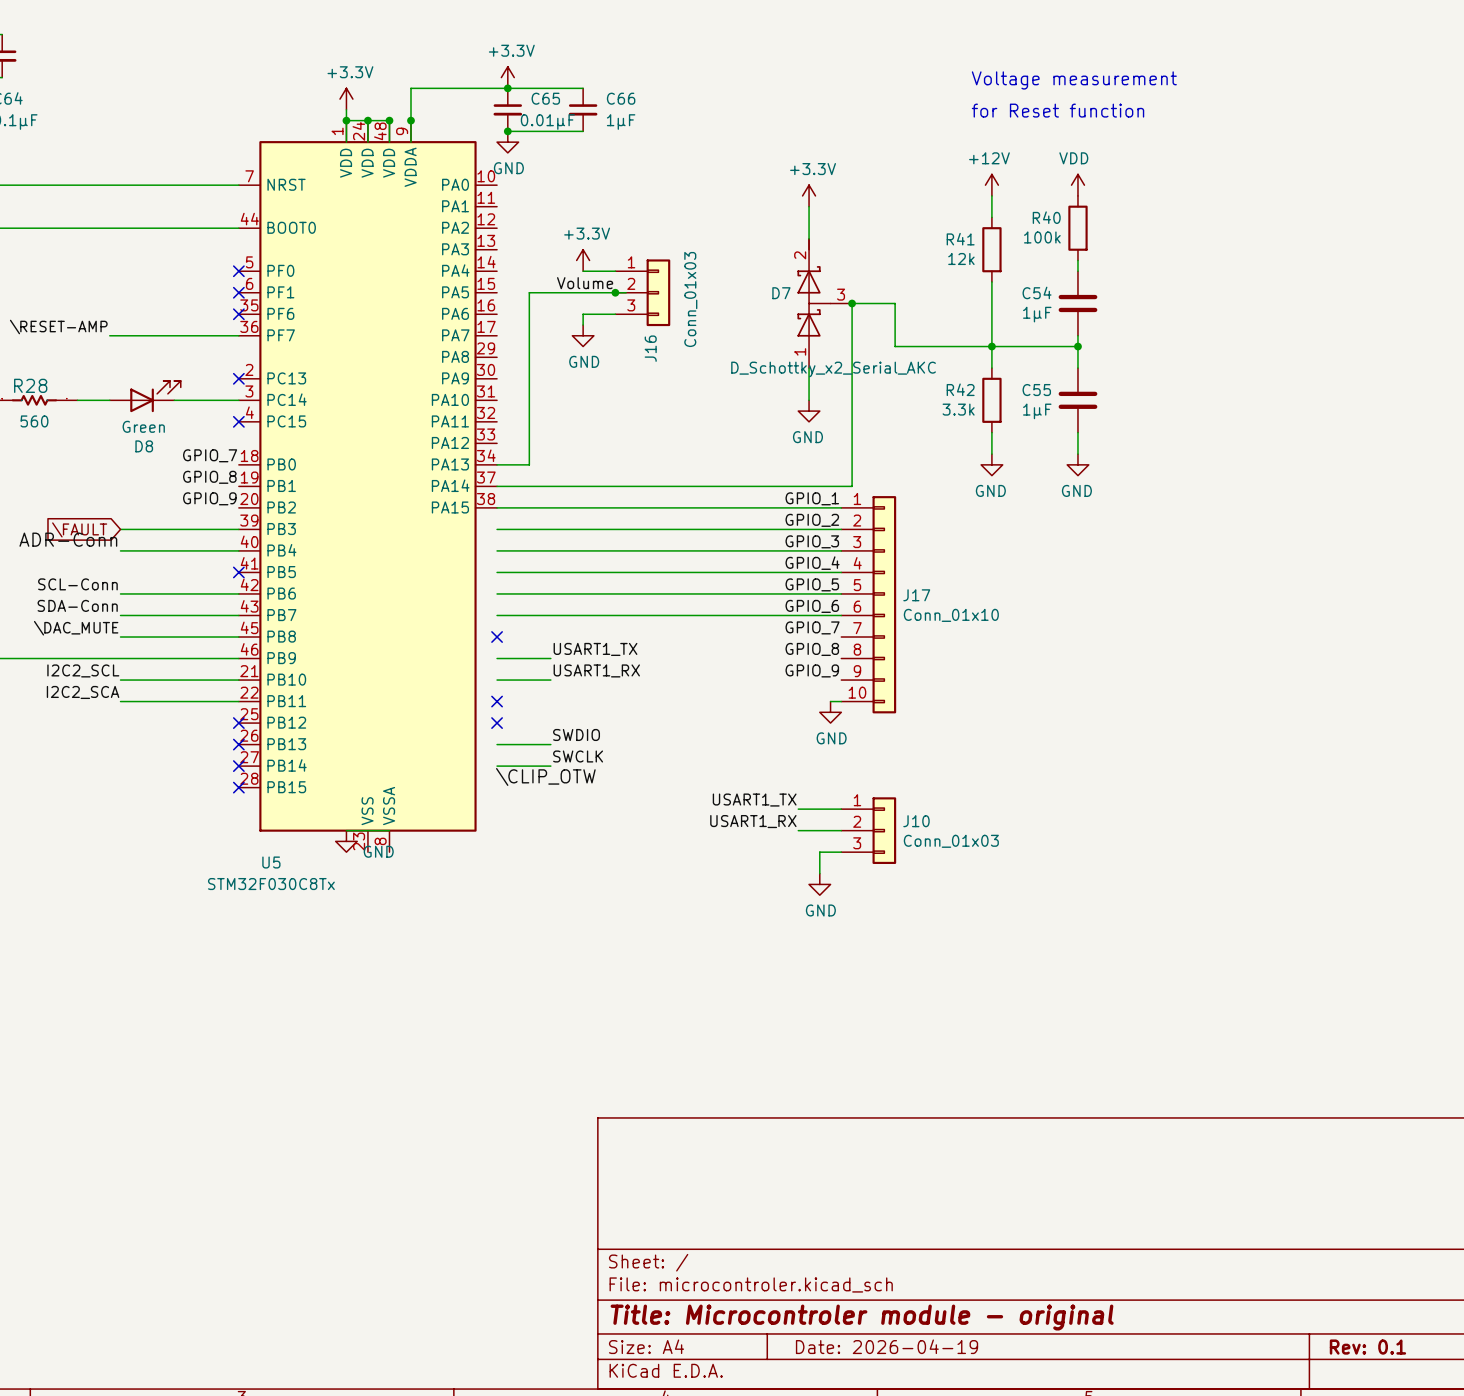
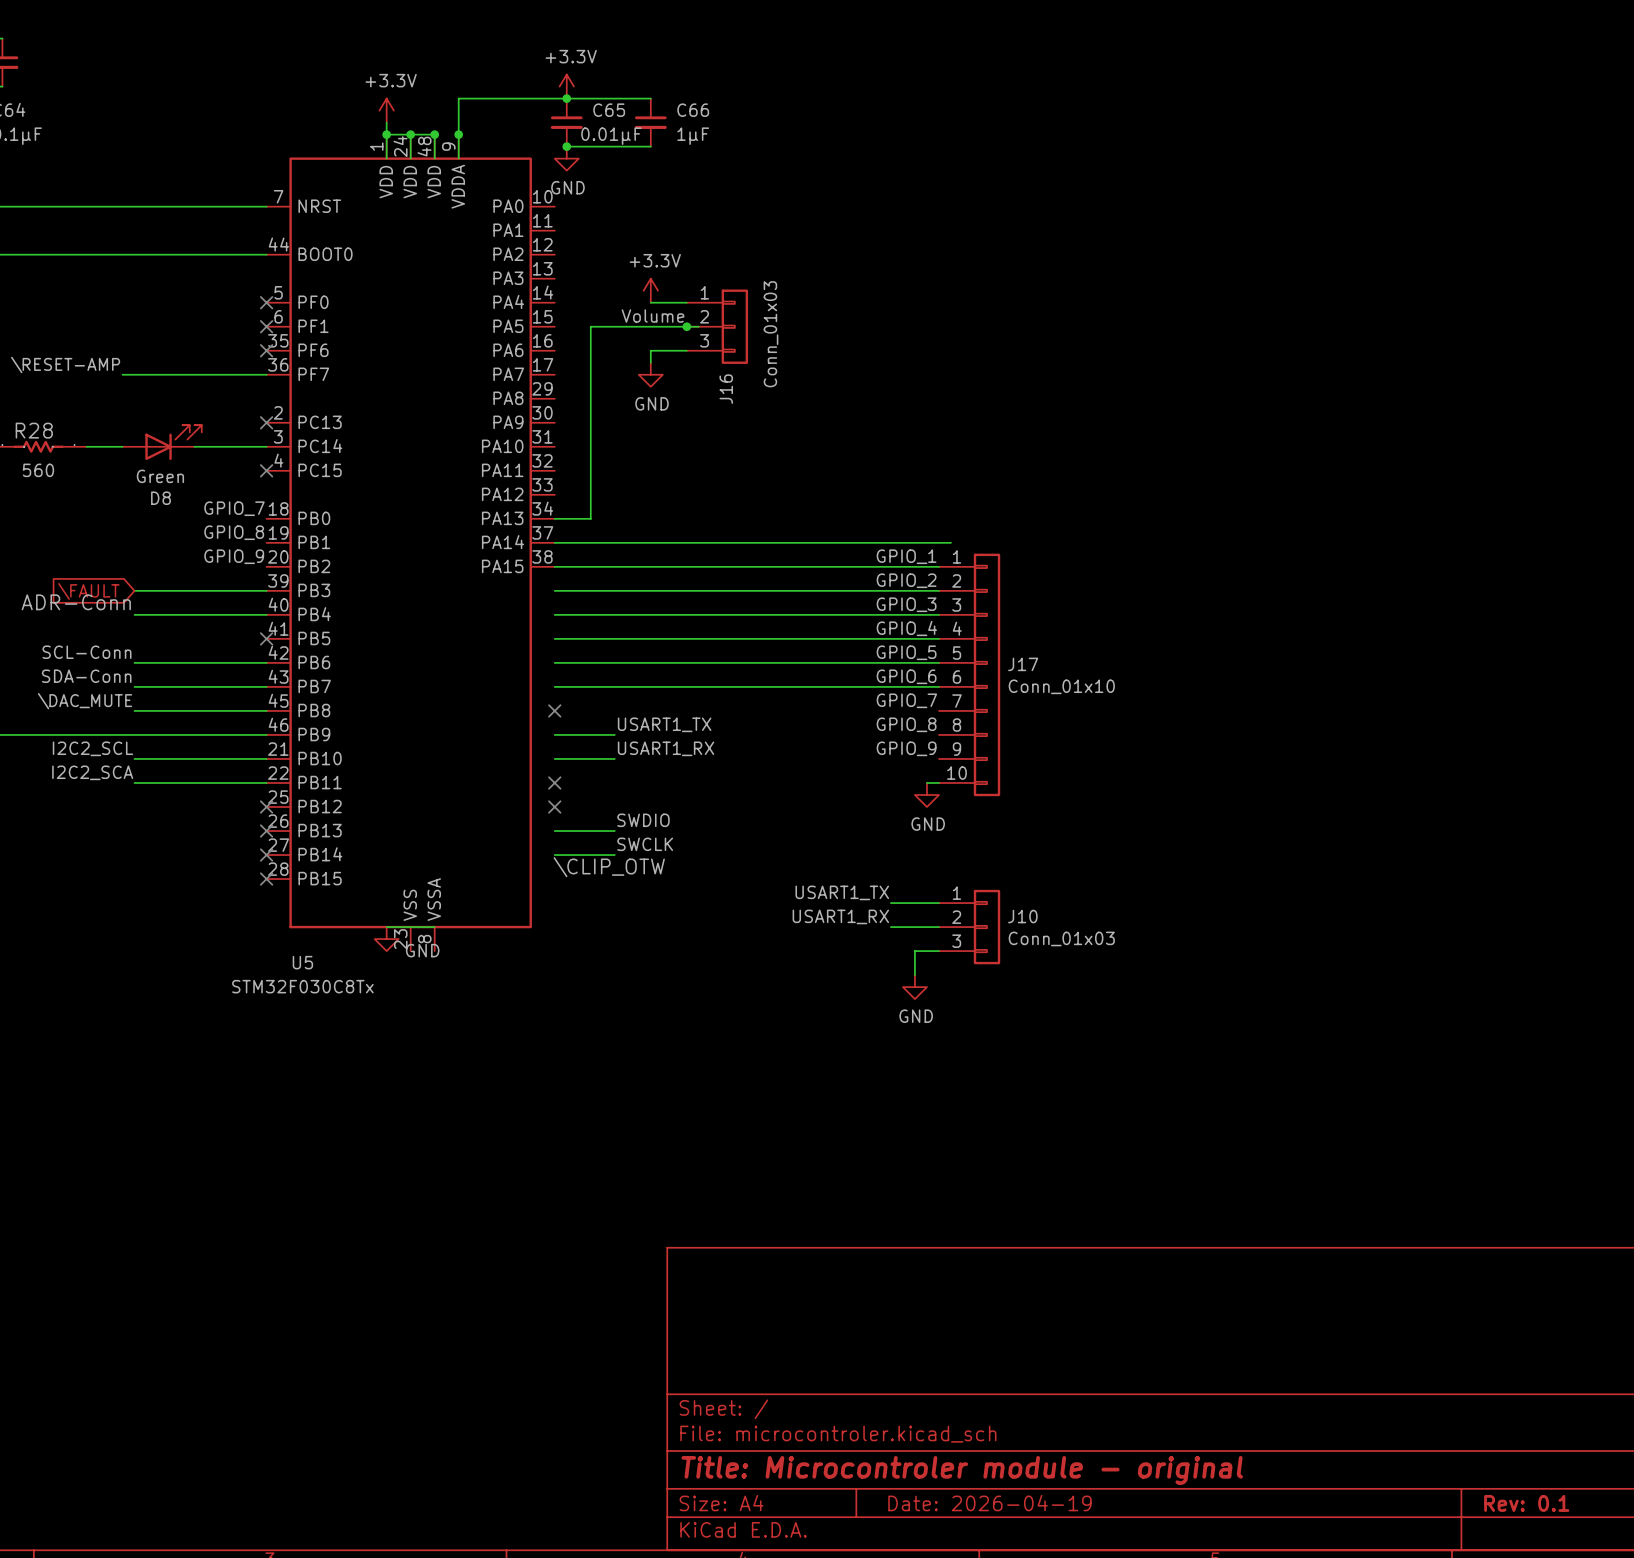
text: Voltage measurement (1074, 80) -> none
text: for Reset function (1058, 110) -> none
power symbol: +12V (991, 185) -> none
power symbol: VDD (1077, 185) -> none
power symbol: +3.3V (809, 195) -> none
wire: (991, 195) (991, 217) -> none
wire: (809, 206) (809, 238) -> none
R40: 100k (1077, 228) -> none
R41: 12k (991, 249) -> none
wire: (1077, 260) (1077, 271) -> none
wire: (991, 281) (991, 368) -> none
D7: D_Schottky_x2_Serial_AKC (824, 303) -> none
junction: (852, 303) -> none
C54: 1µF (1077, 303) -> none
wire: (1077, 335) (1077, 368) -> none
junction: (991, 346) -> none
wire: (1077, 346) (895, 346) (895, 303) (852, 303) (852, 486) -> none
junction: (1077, 346) -> none
wire: (809, 368) (809, 400) -> none
R42: 3.3k (991, 400) -> none
C55: 1µF (1077, 400) -> none
power symbol: GND (809, 411) -> none
wire: (991, 432) (991, 454) -> none
wire: (1077, 432) (1077, 454) -> none
power symbol: GND (991, 464) -> none
power symbol: GND (1077, 464) -> none

